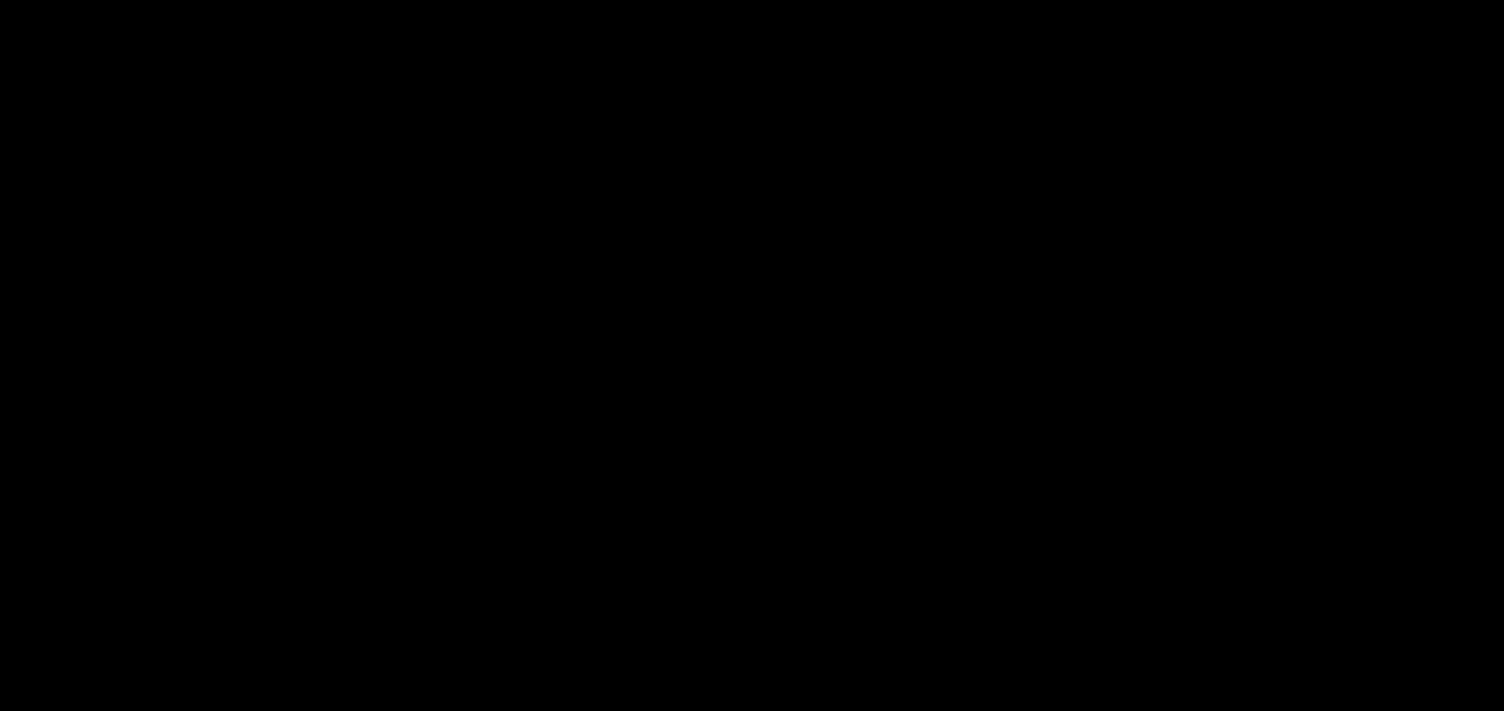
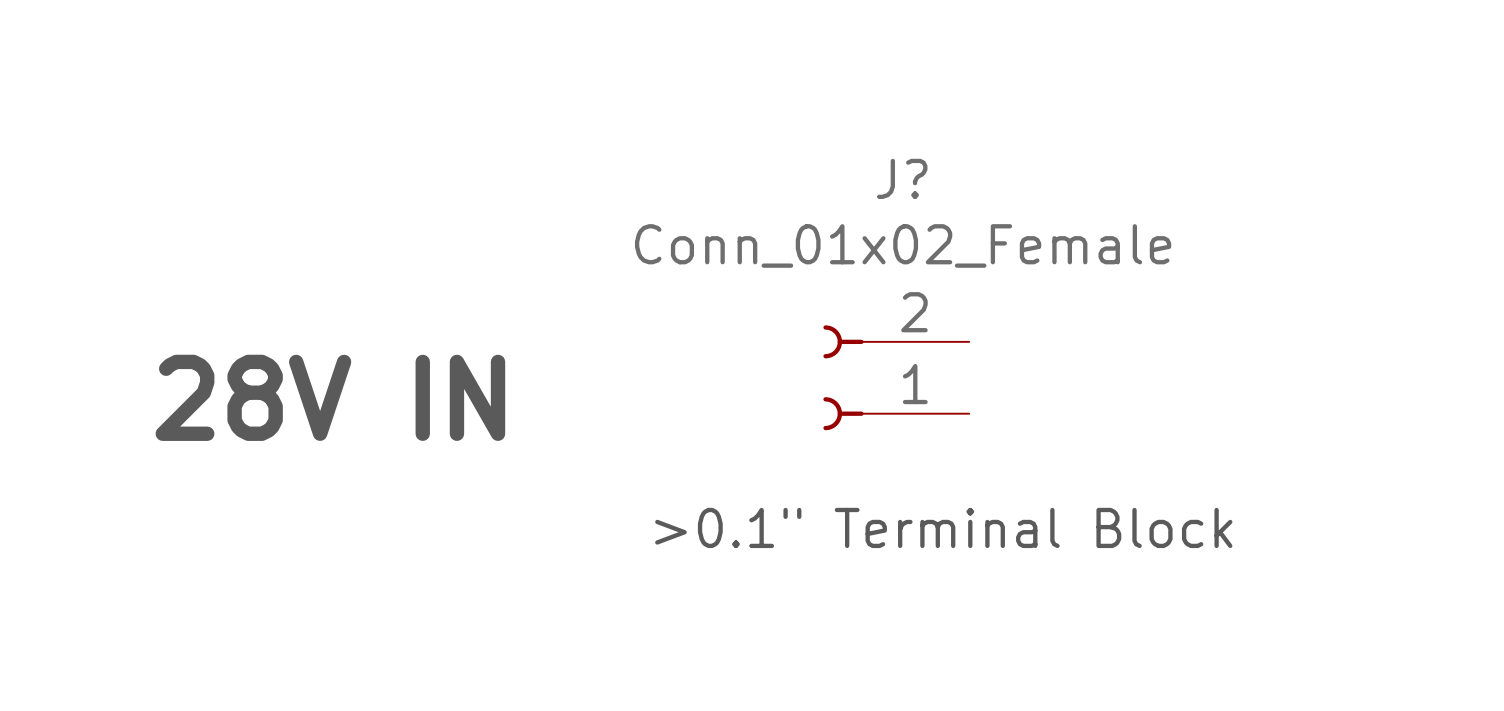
J?: none -> Conn_01x02_Female (896, 377)
text: none -> 28V IN (330, 397)
text: none -> >0.1" Terminal Block (943, 527)

